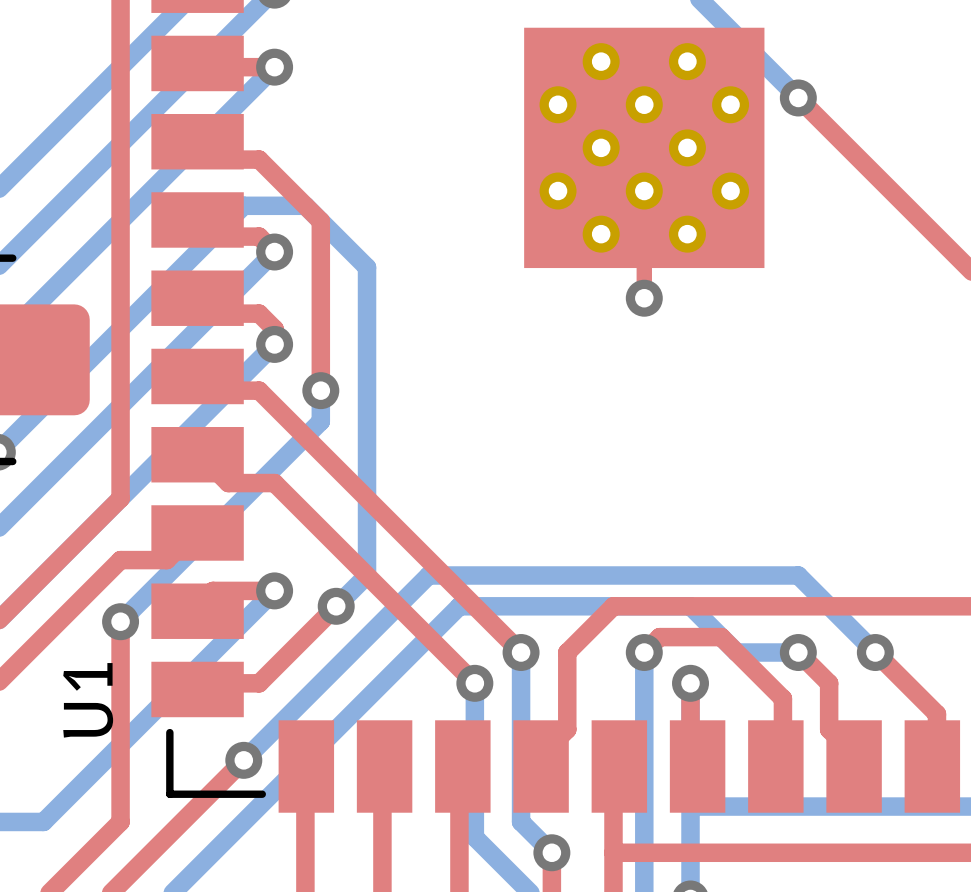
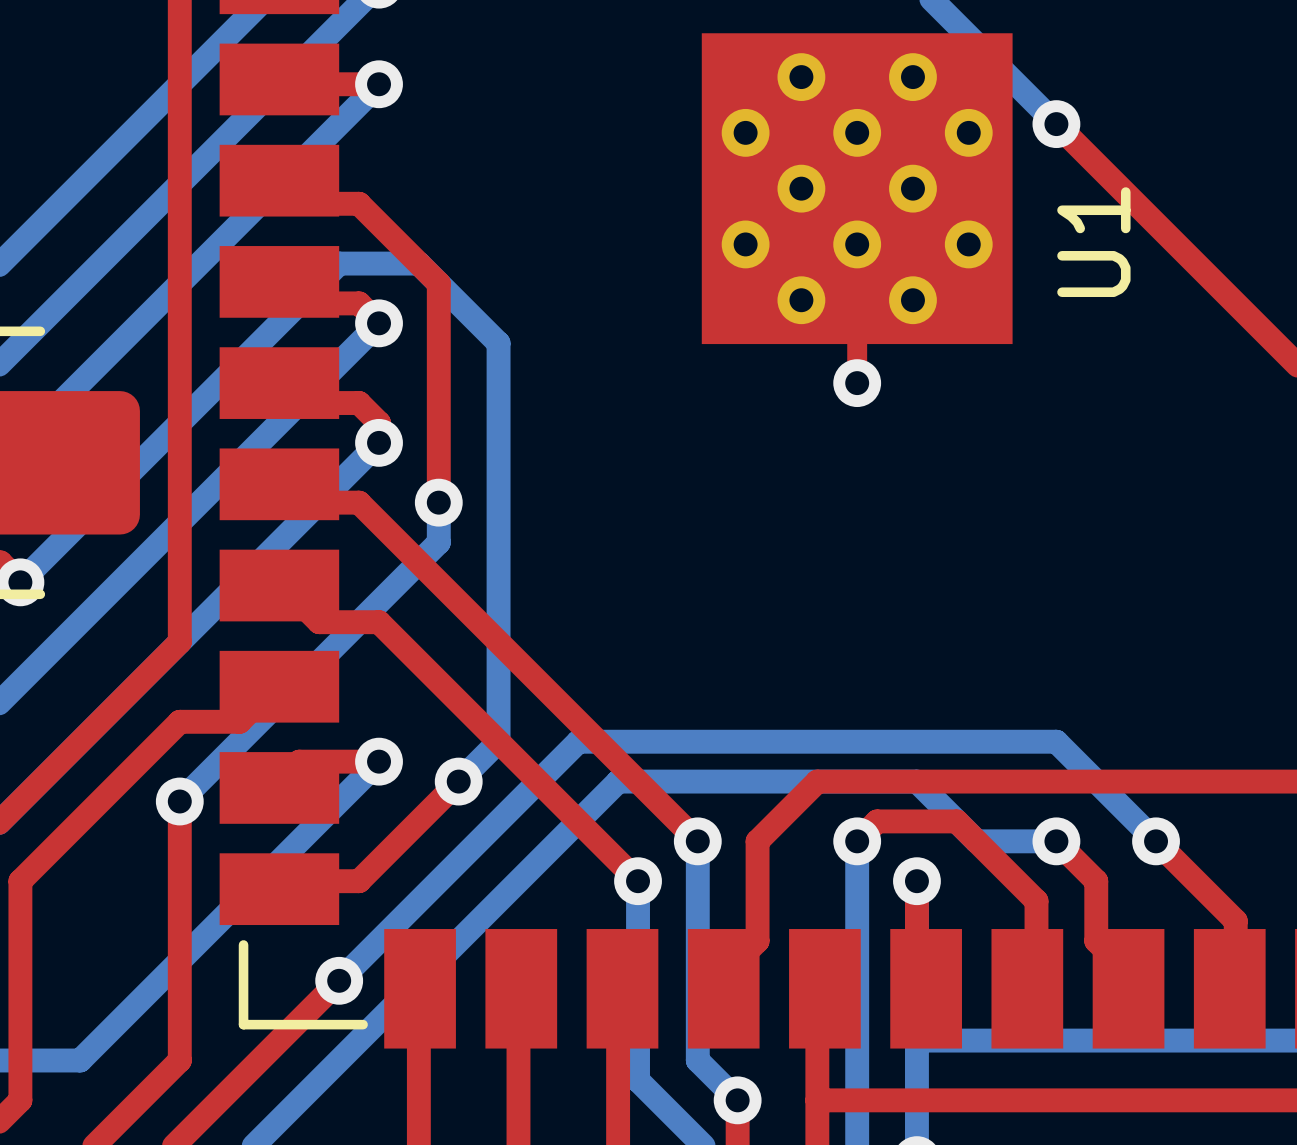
U1 name position: U1 (88, 700) -> U1 (1093, 242)

